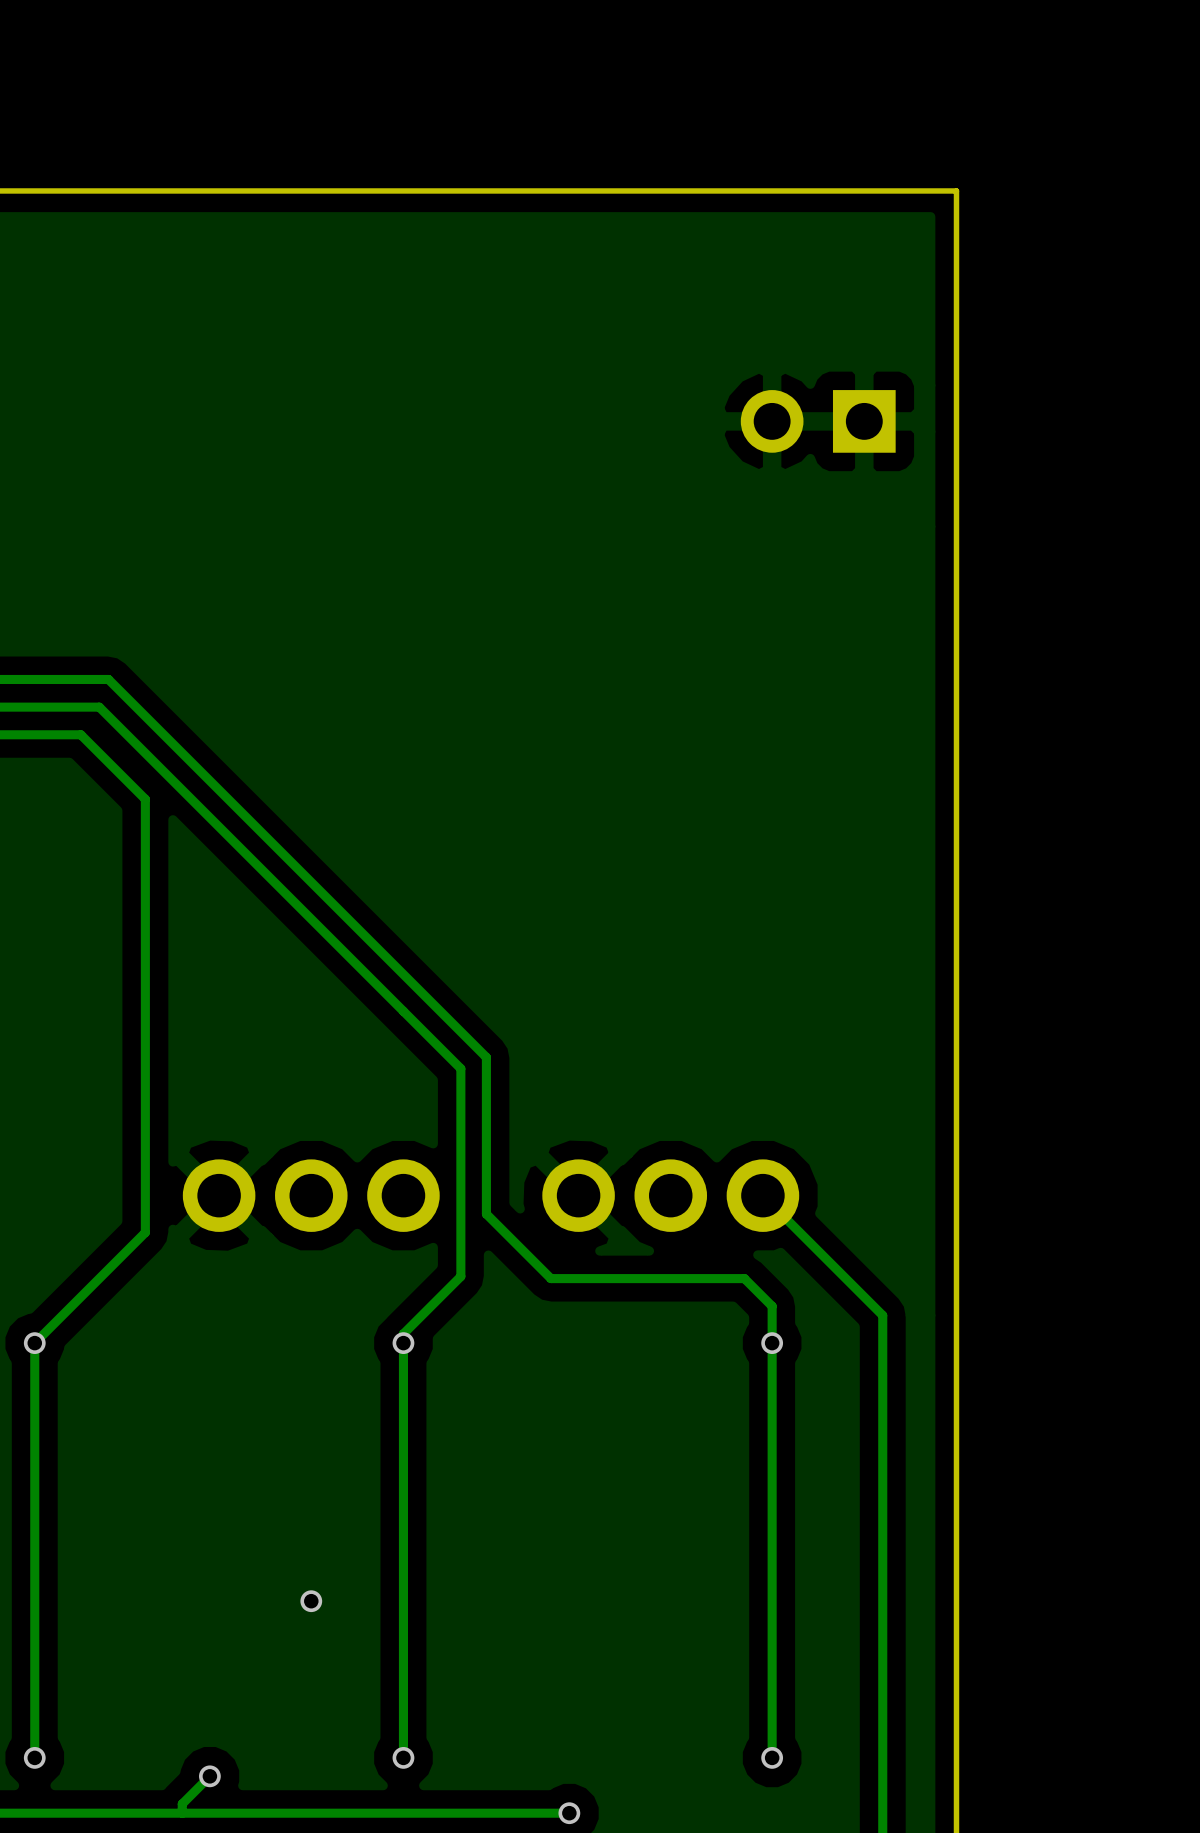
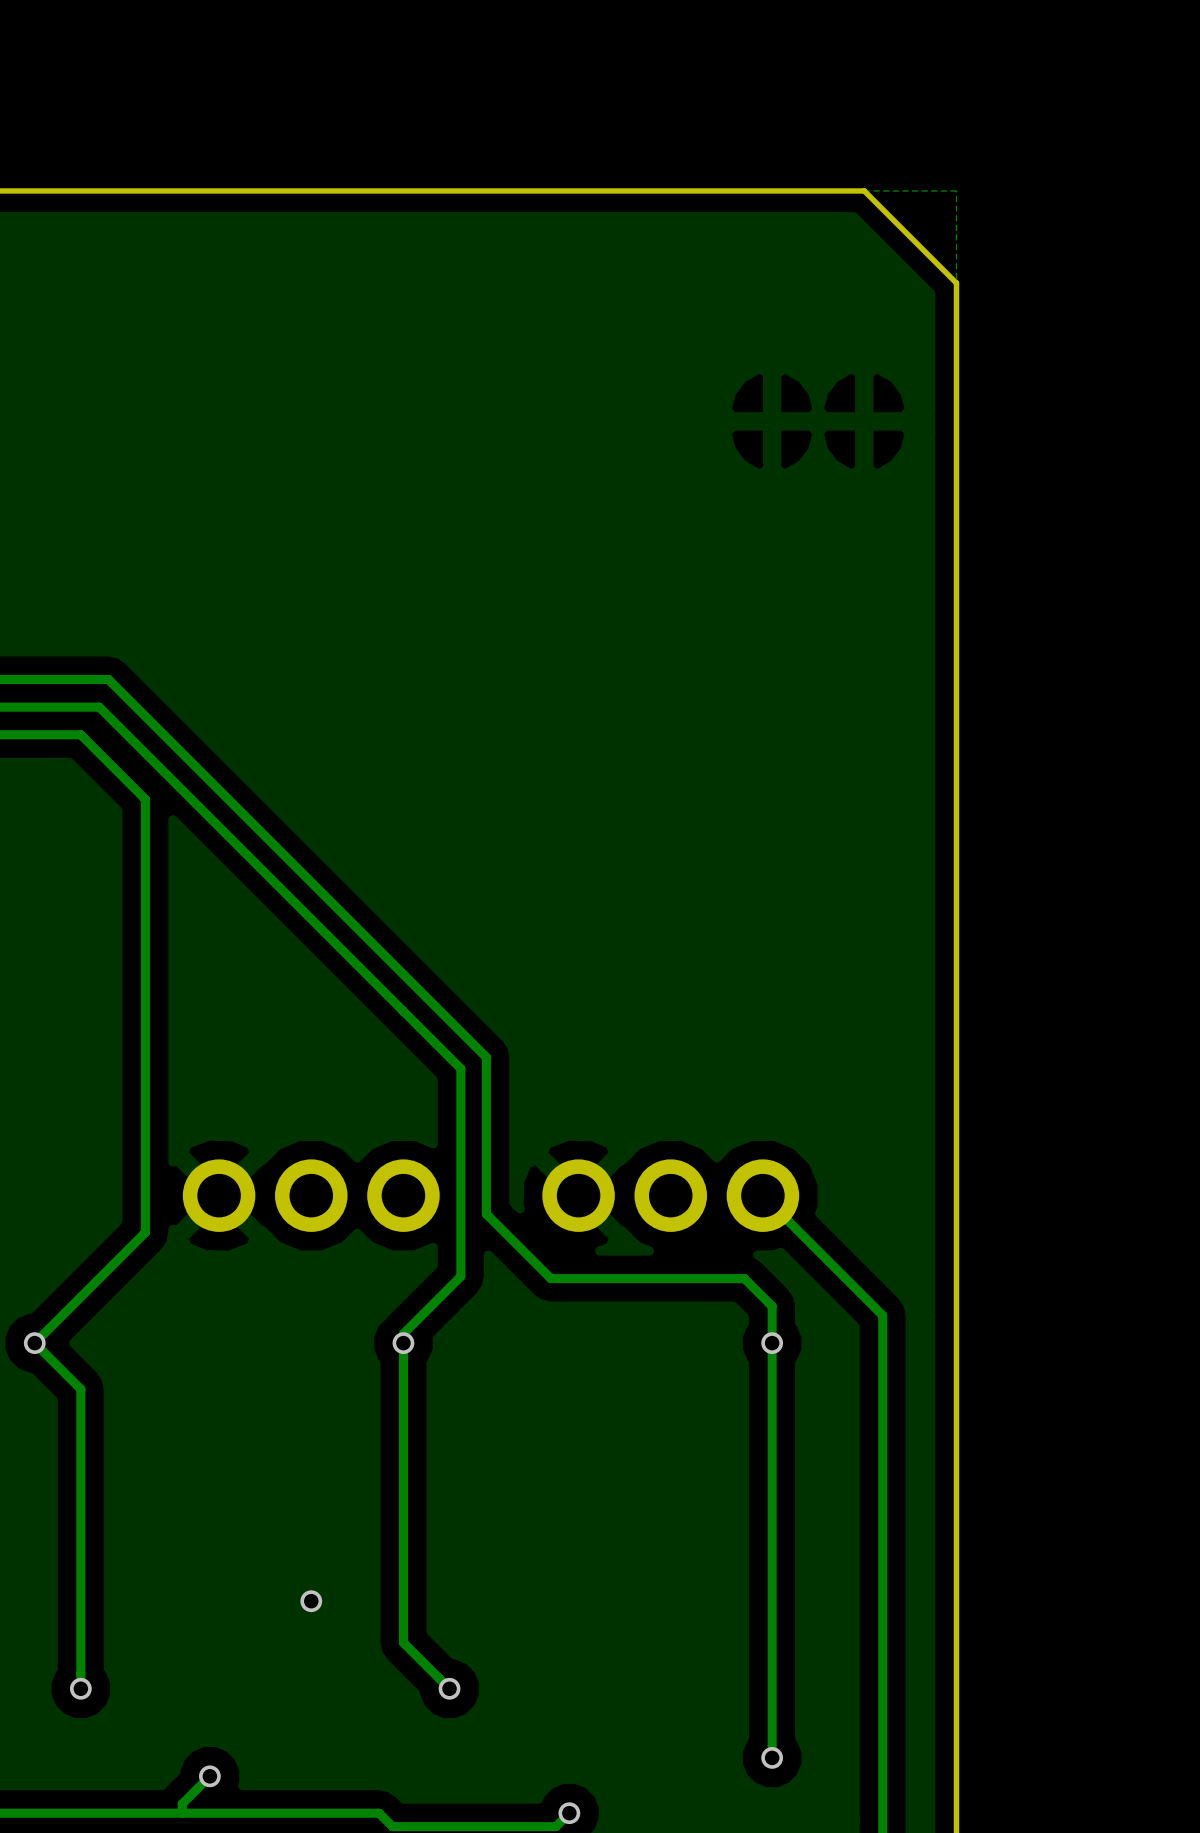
board edge: (864, 190) (956, 190) (956, 283) -> (864, 190) (956, 283)
part: (818, 421) -> none
track: (34, 1343) (34, 1757) -> (34, 1343) (80, 1389) (80, 1688)
track: (403, 1642) (403, 1757) -> (403, 1642) (449, 1688)
via position: (34, 1757) -> (80, 1688)
via position: (403, 1757) -> (449, 1688)
track: (569, 1813) (379, 1813) -> (569, 1813) (555, 1826) (392, 1826) (379, 1813)

